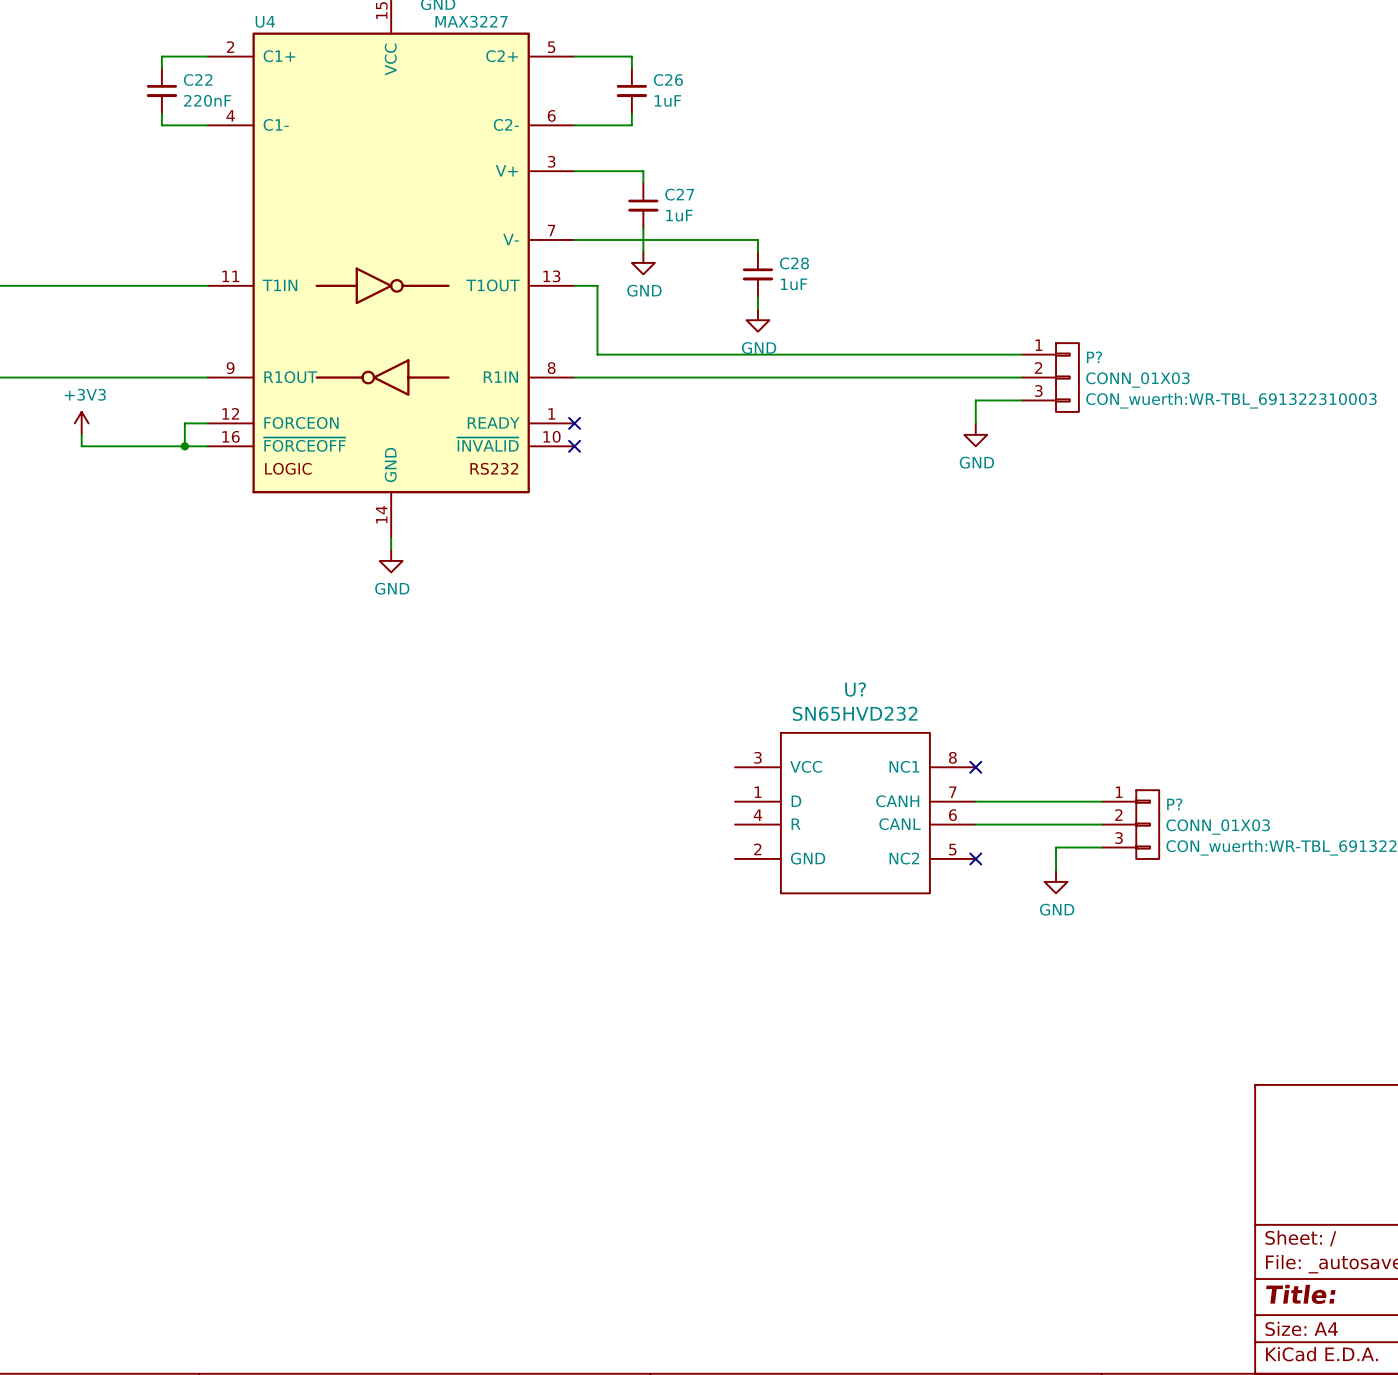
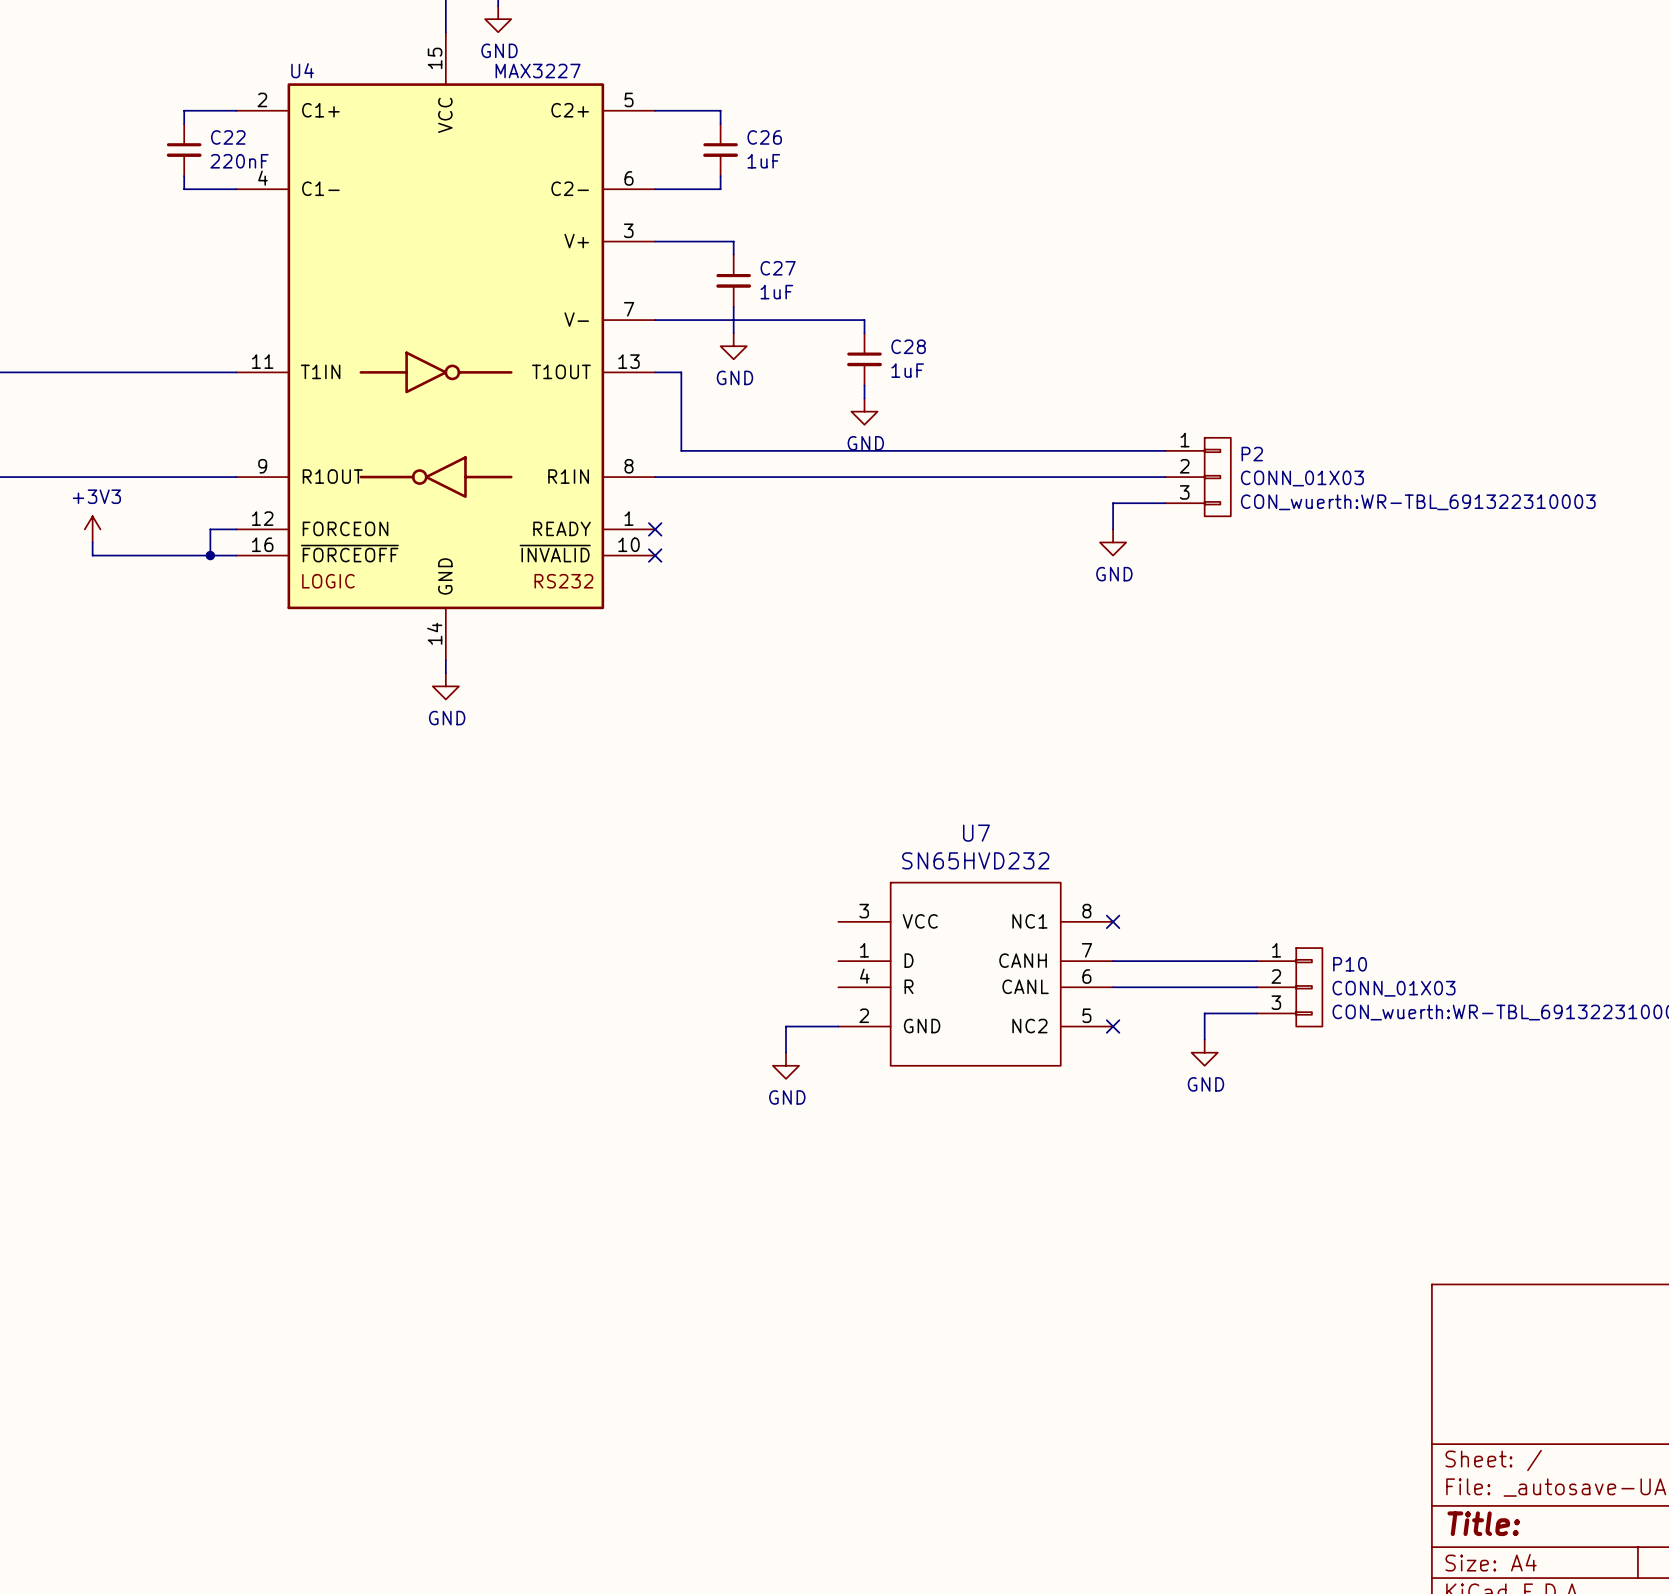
P? name: P? (1094, 357) -> P2 (1252, 454)
U? name: U? (855, 689) -> U7 (976, 833)
P? name: P? (1174, 804) -> P10 (1350, 964)
wire: none -> (838, 1026) (786, 1026) (786, 1052)
power symbol: none -> GND (786, 1065)

